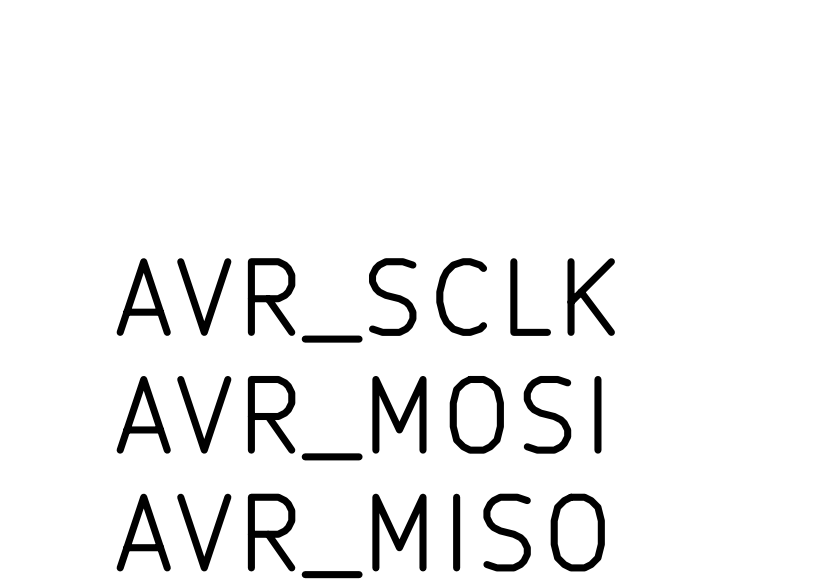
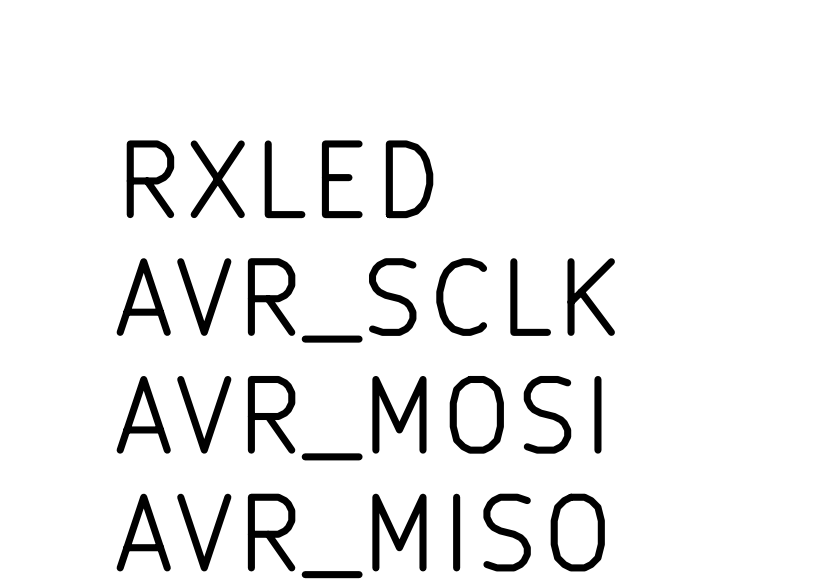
label: none -> RXLED (279, 179)

